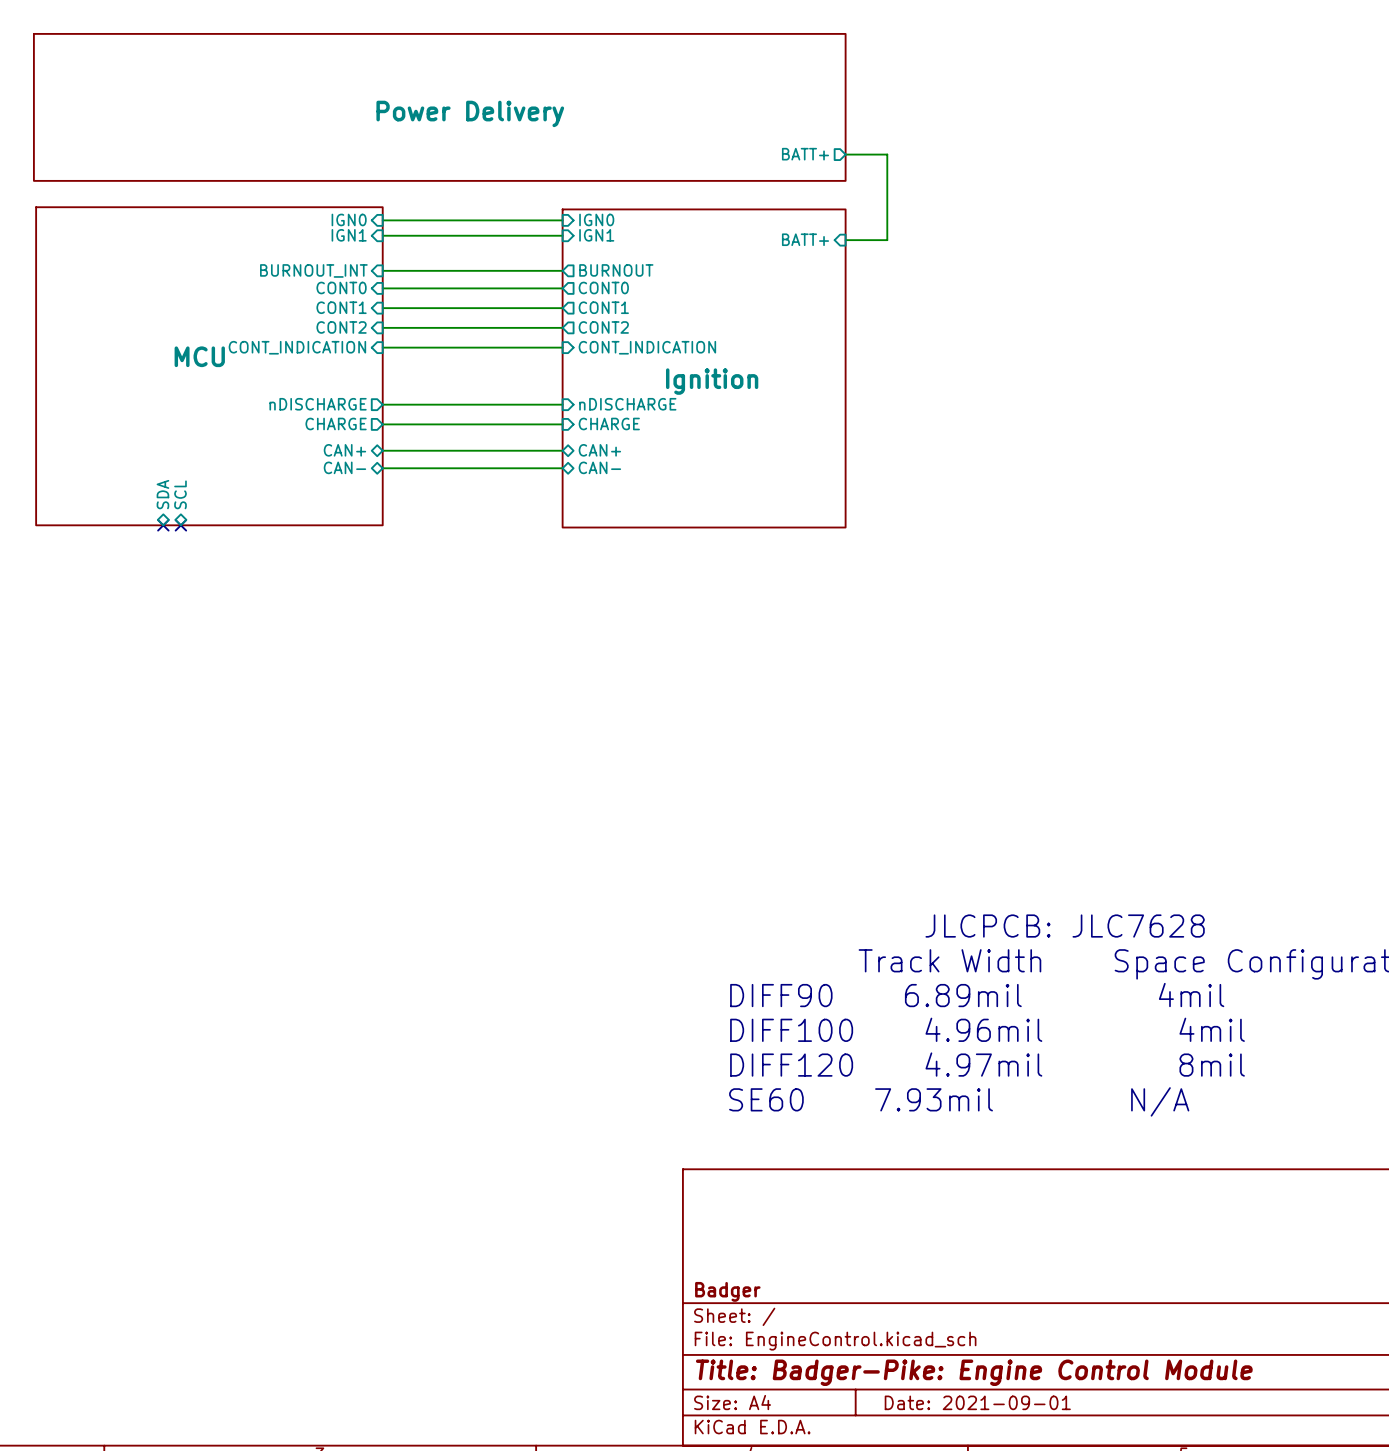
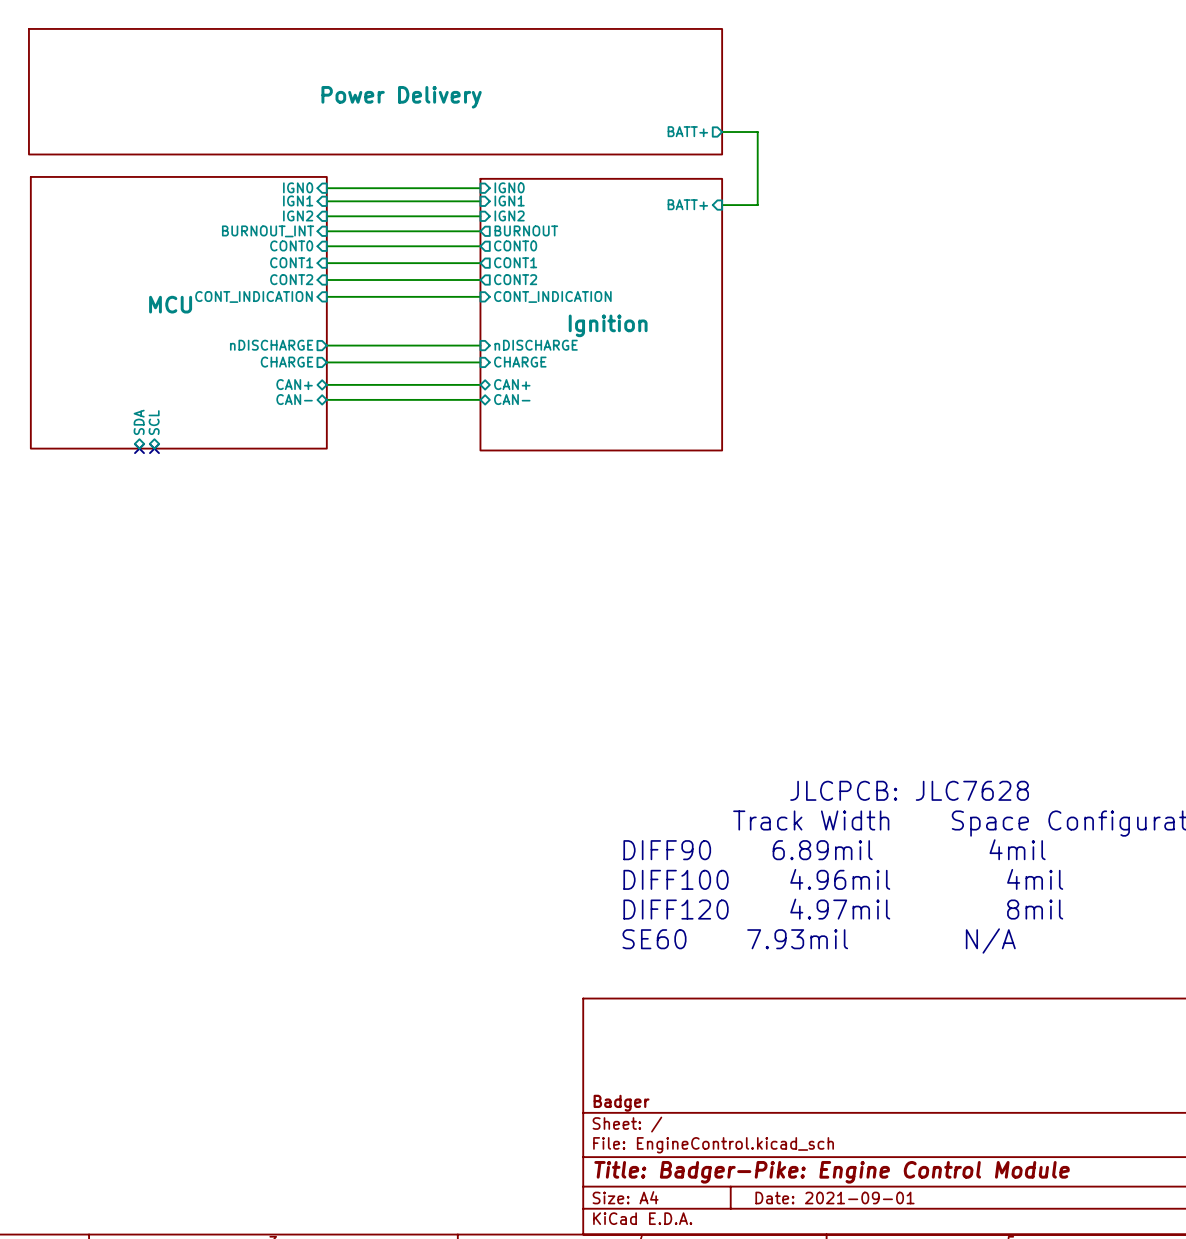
sheet pin: none -> IGN2 (298, 215)
sheet pin: none -> IGN2 (509, 215)
wire: none -> (326, 216) (480, 216)

